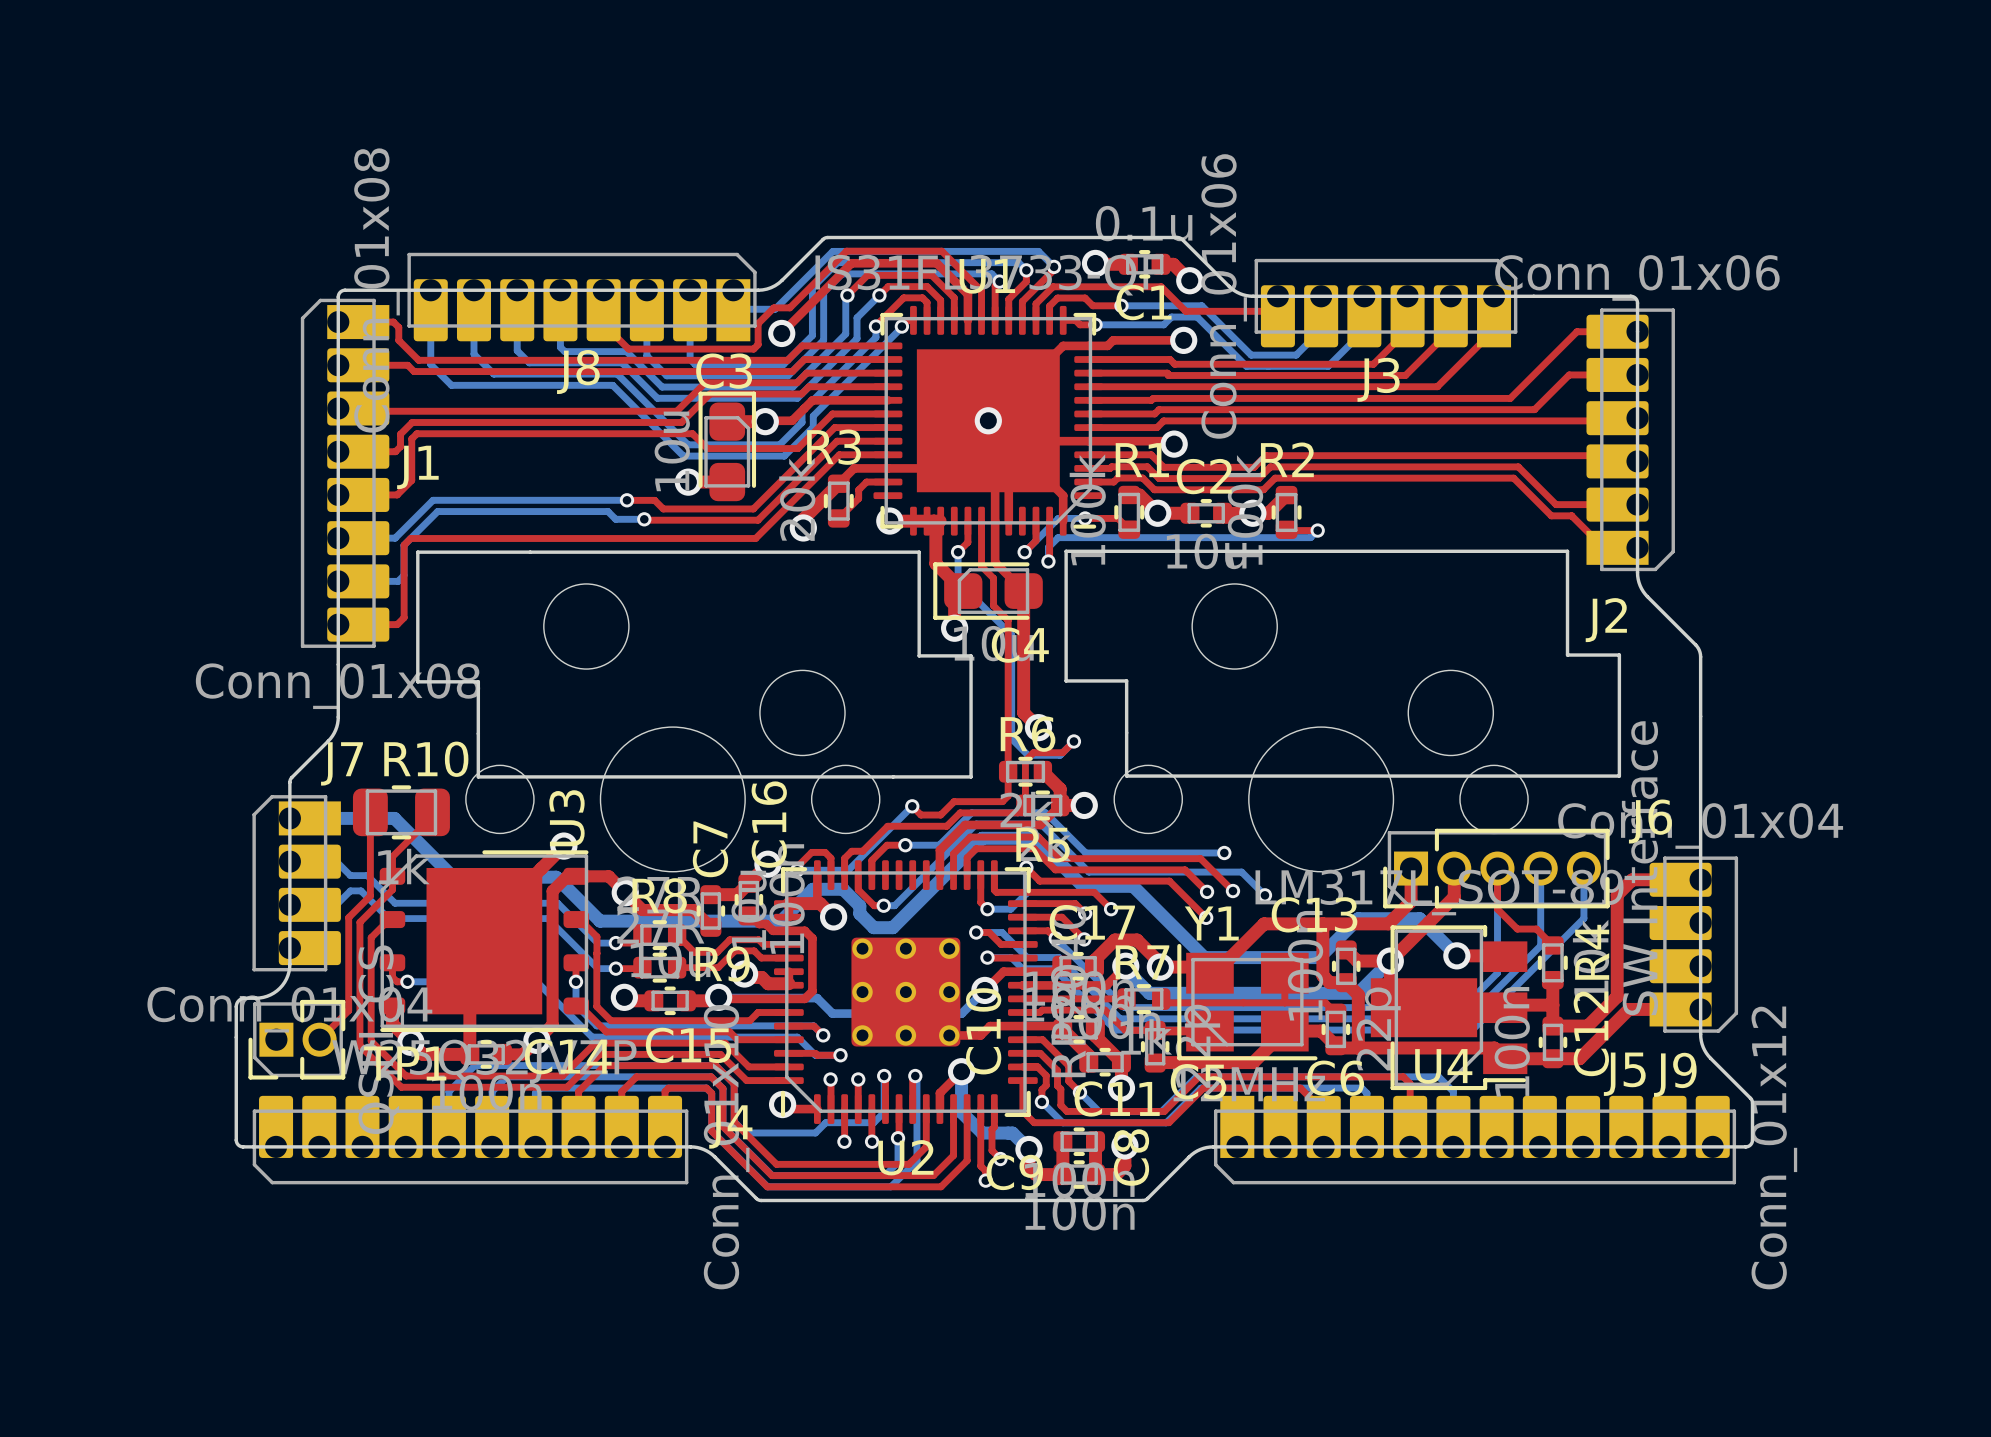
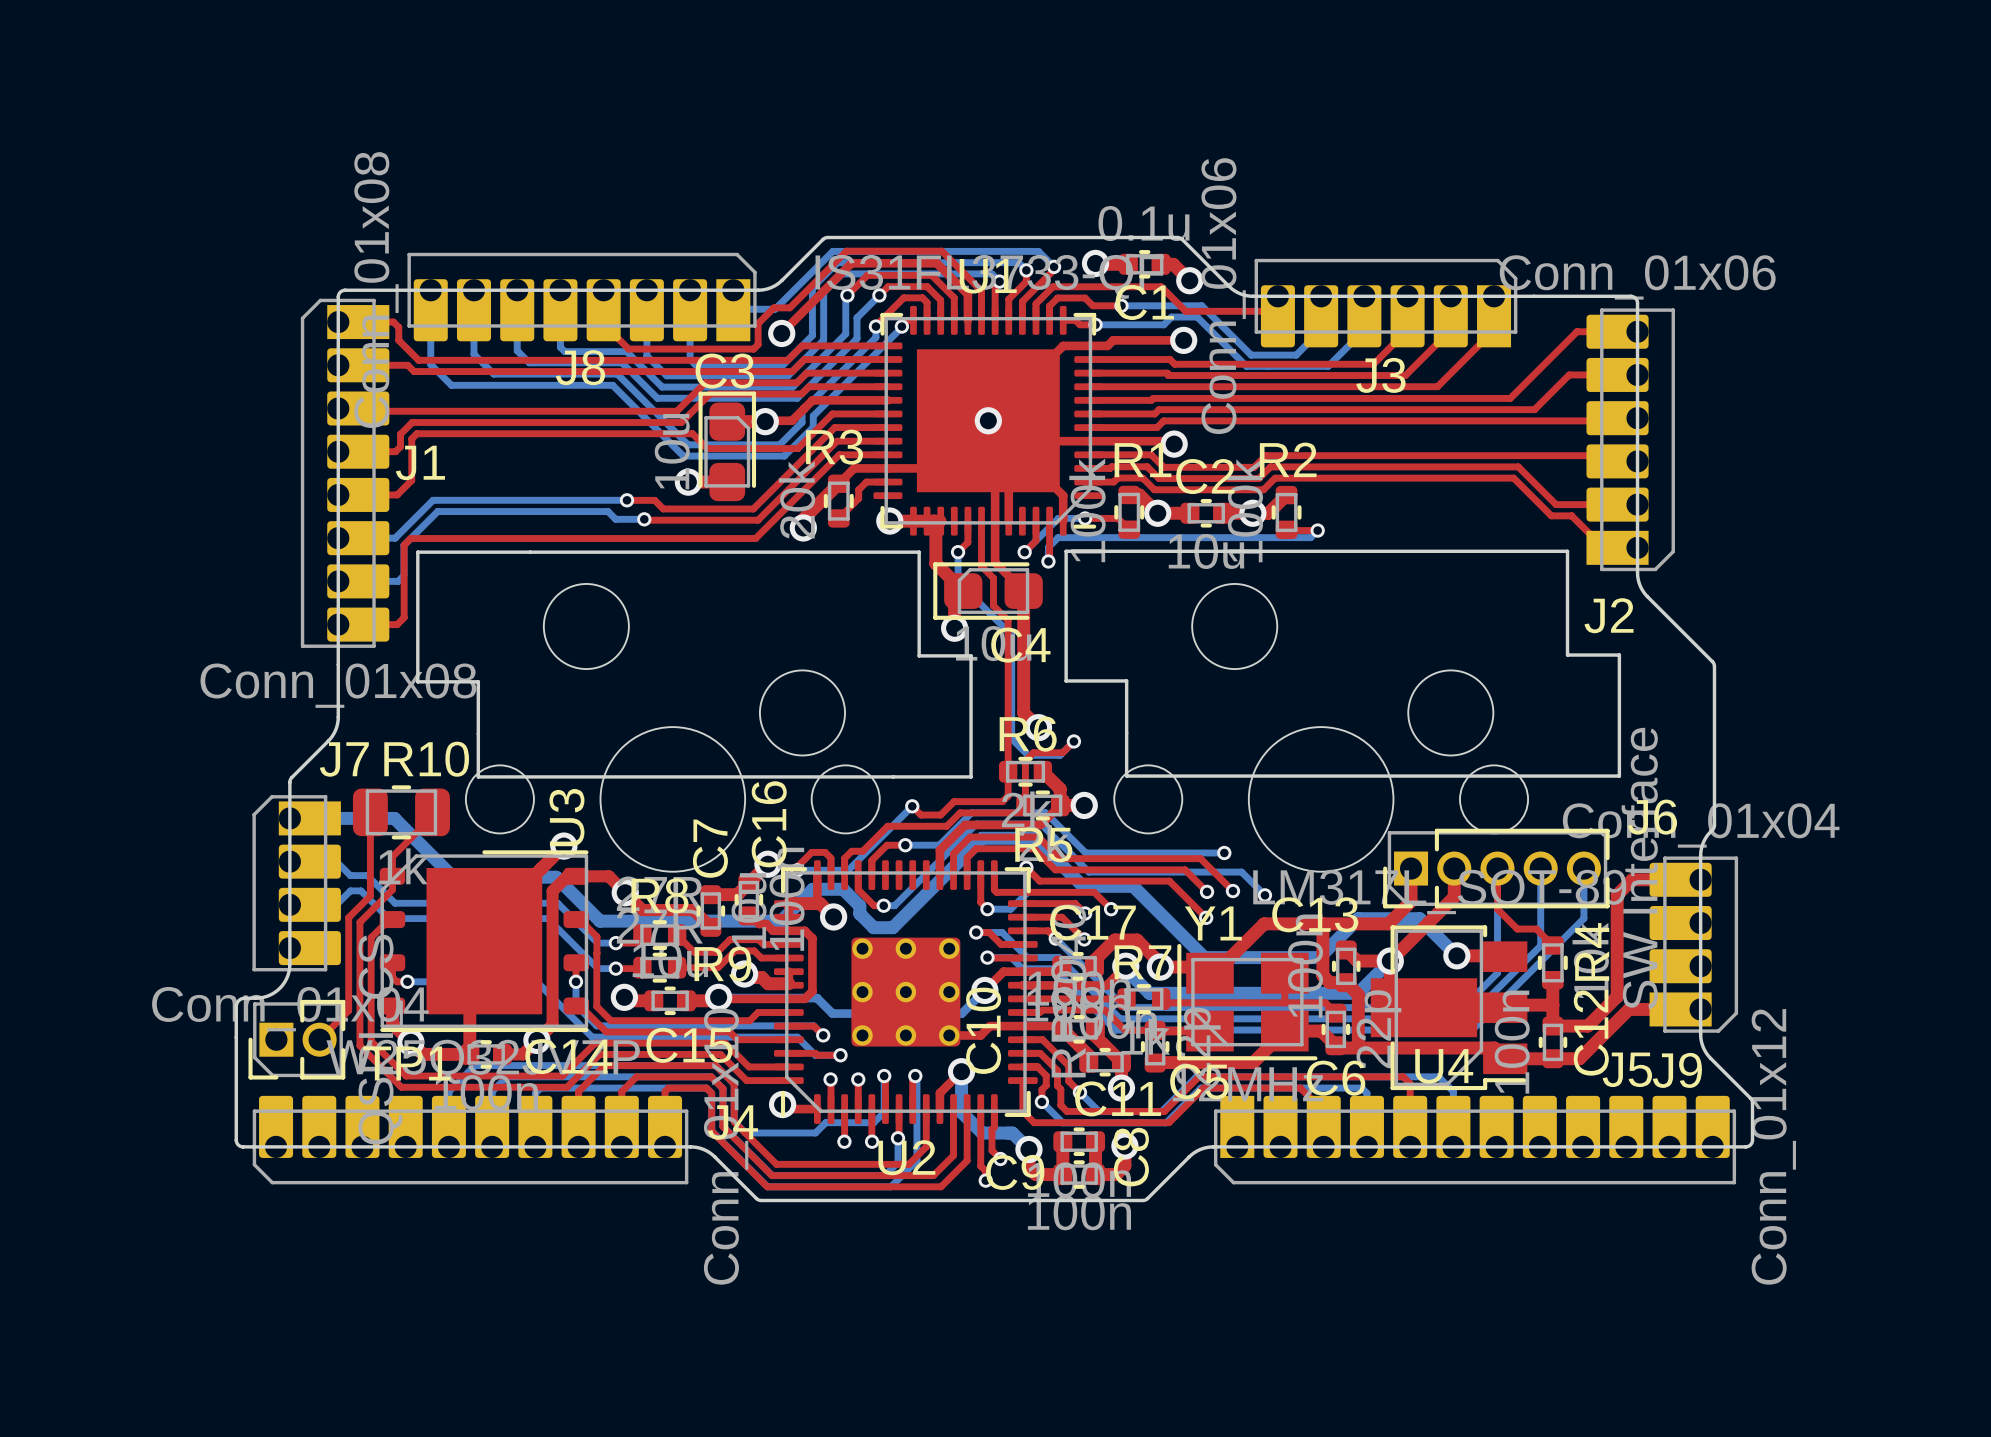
board edge: (1695, 644) (1700, 656) (1700, 855) -> (1695, 644) (1713, 662) (1714, 666) (1714, 825) (1703, 842) (1700, 855)

